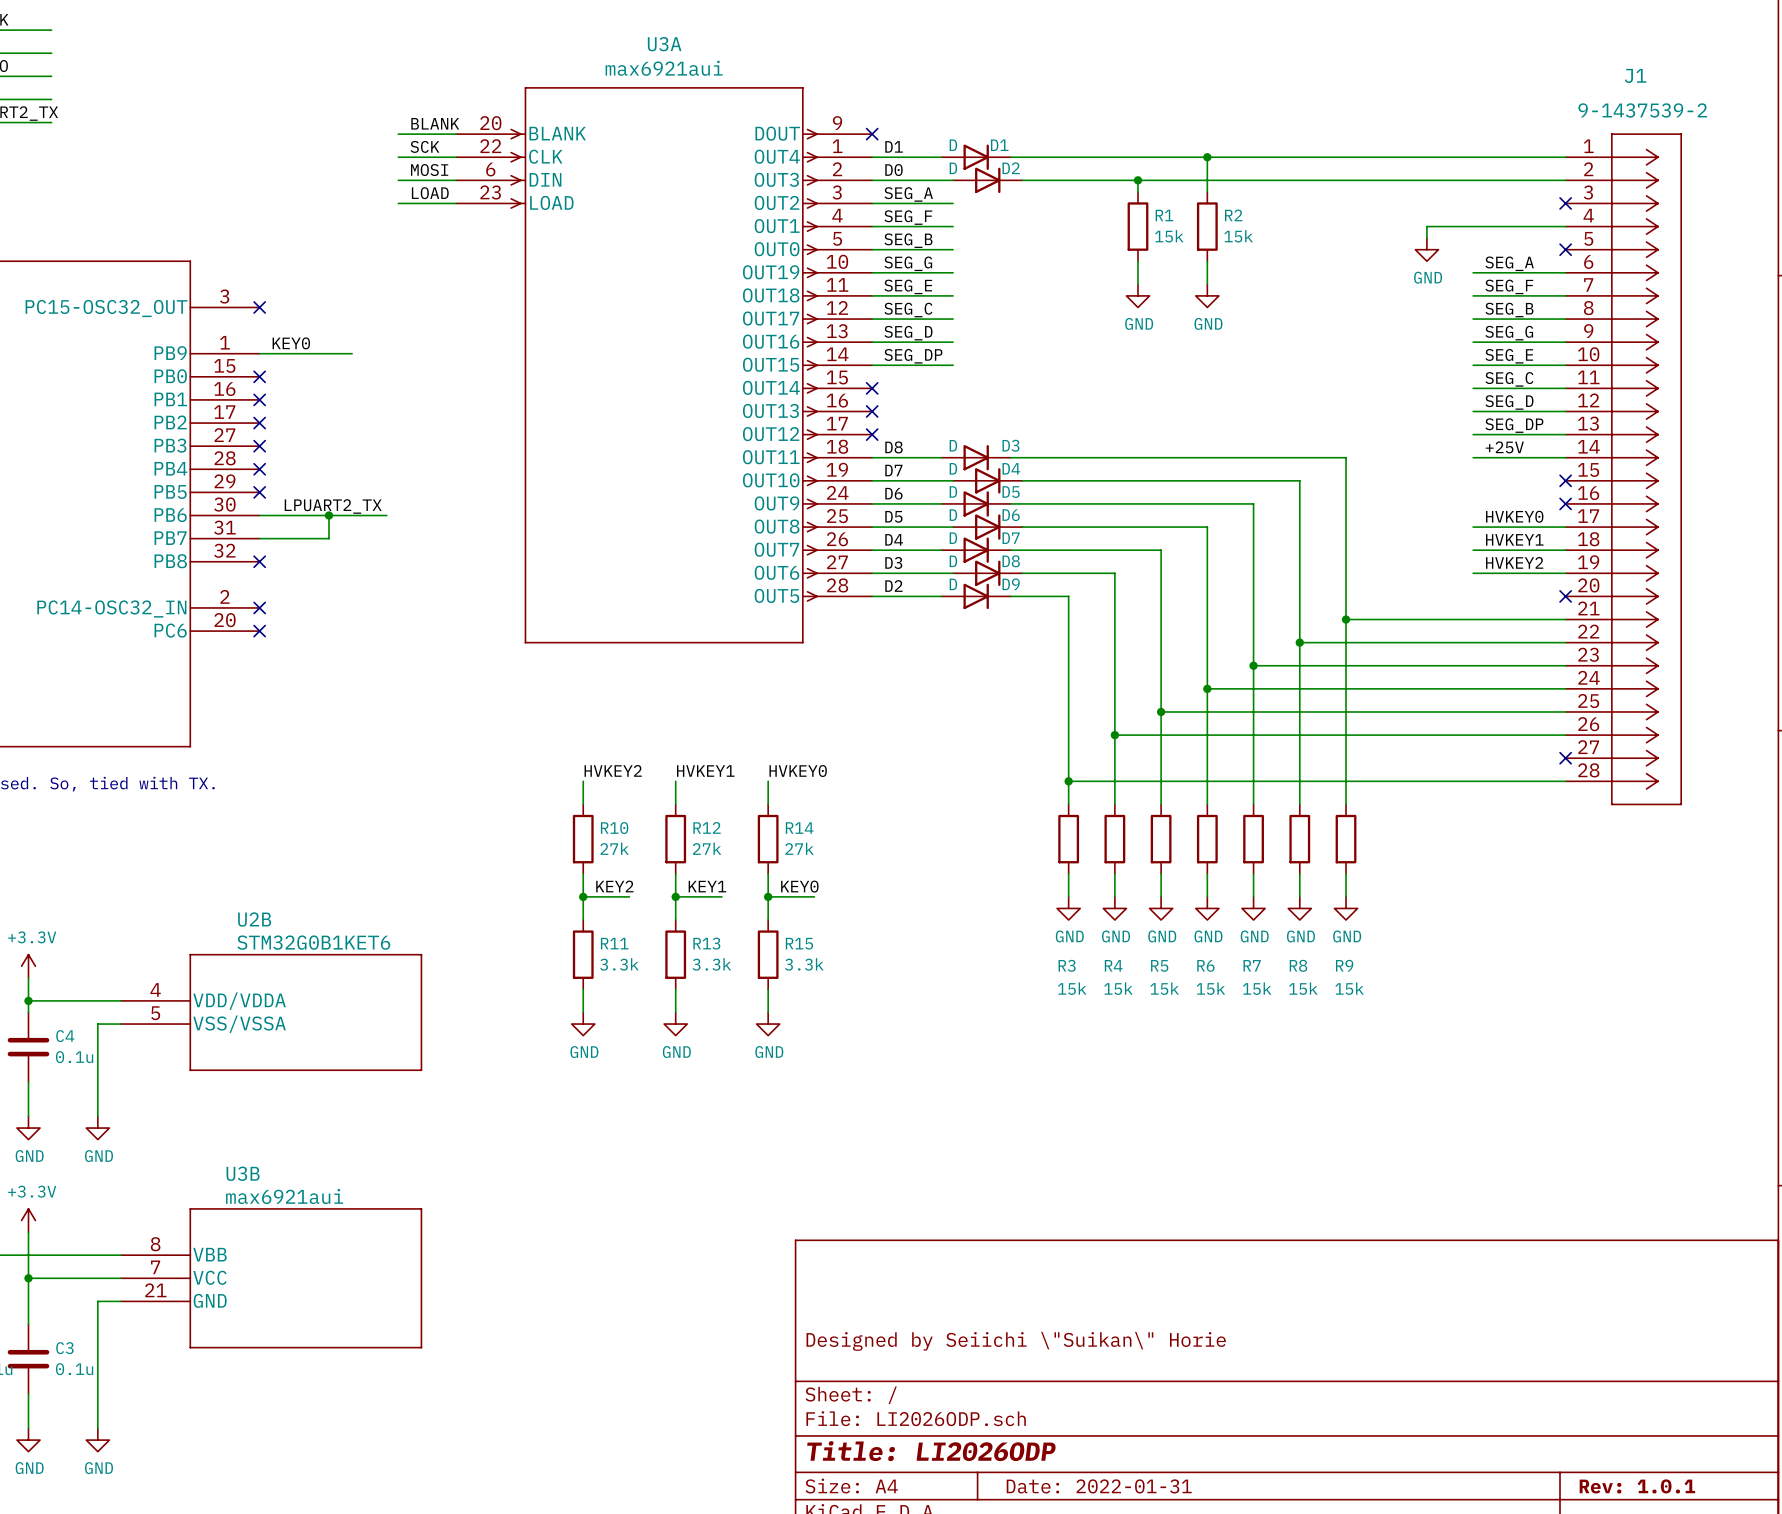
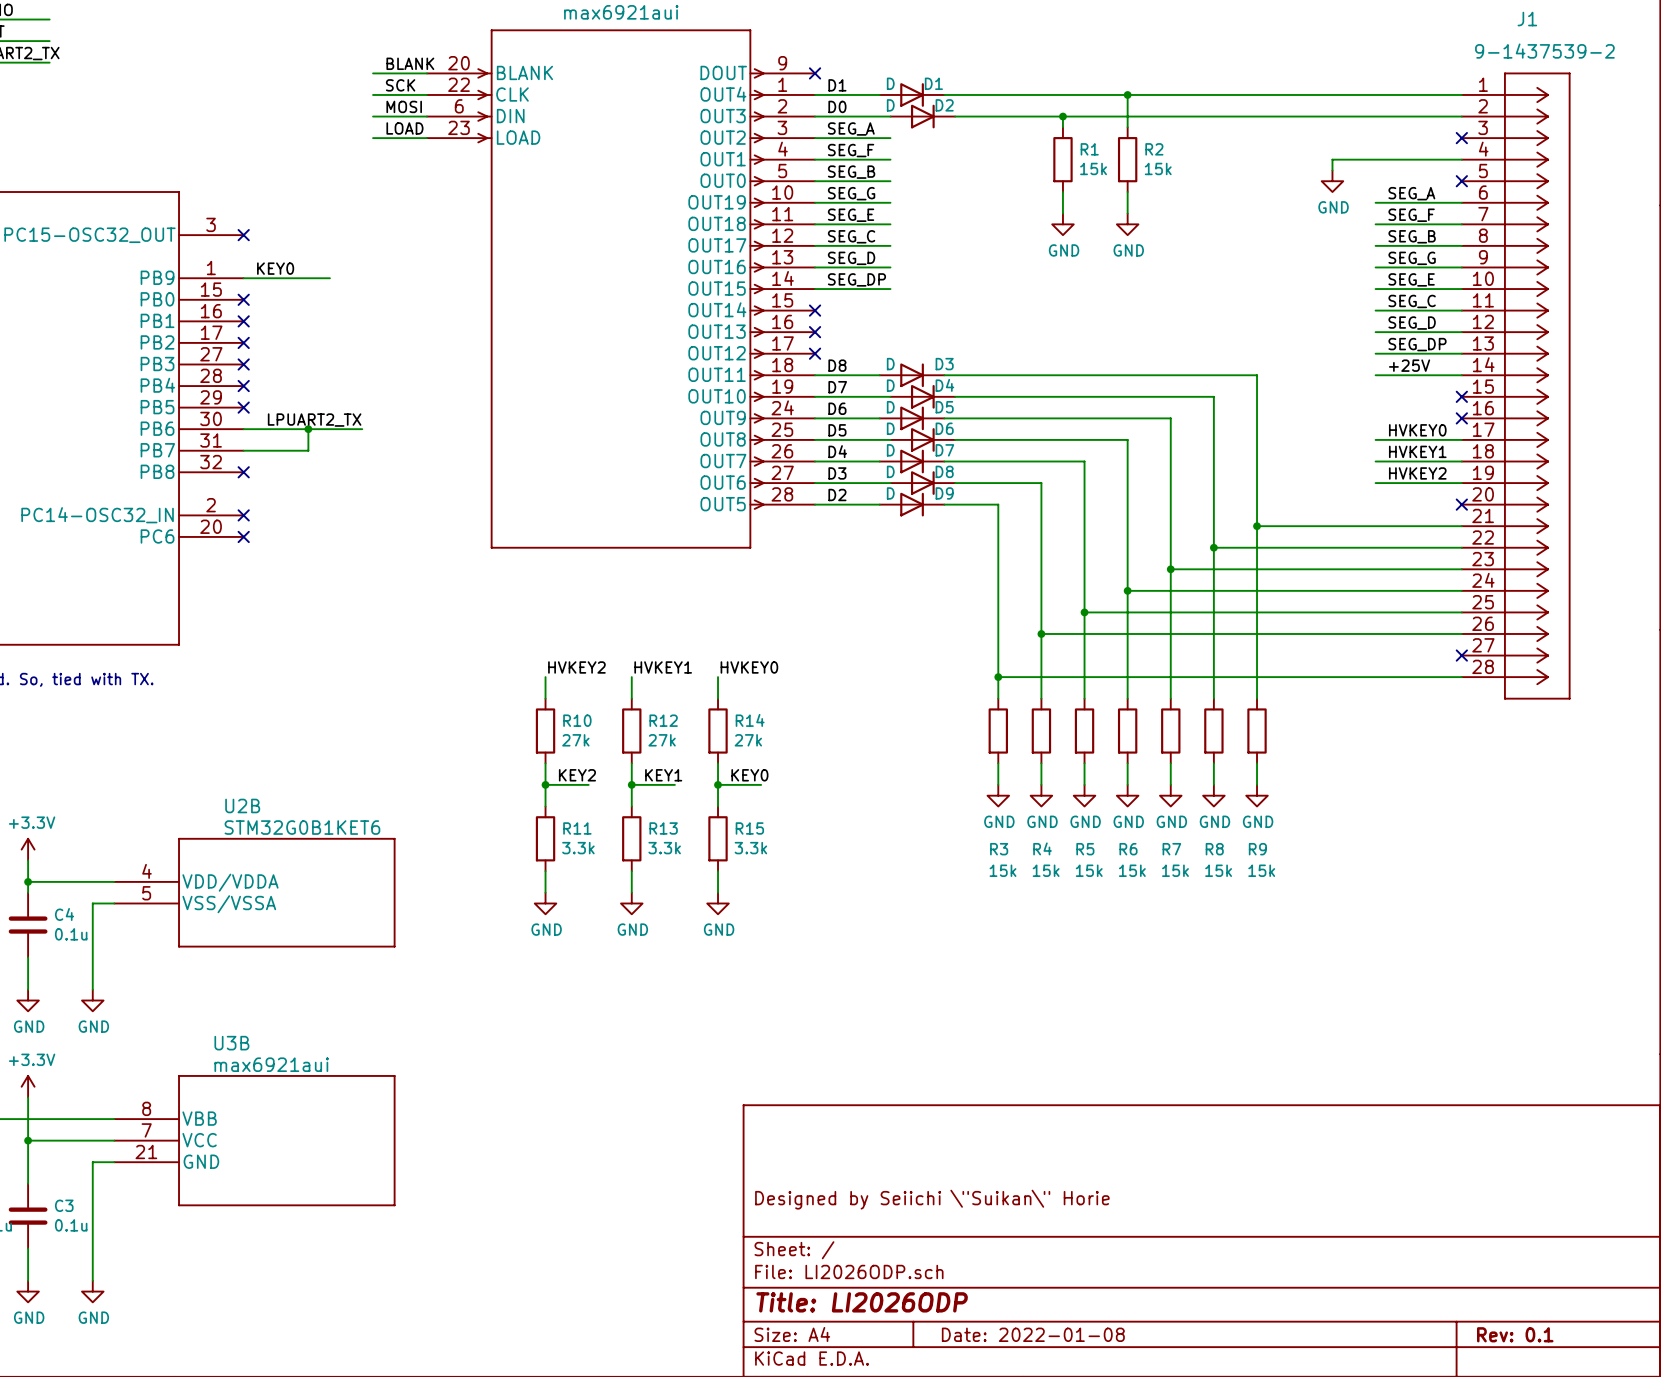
title block: Date: 2022-01-31 (1099, 1486) -> Date: 2022-01-08 (1033, 1334)
title block: Rev: 1.0.1 (1637, 1486) -> Rev: 0.1 (1515, 1334)

